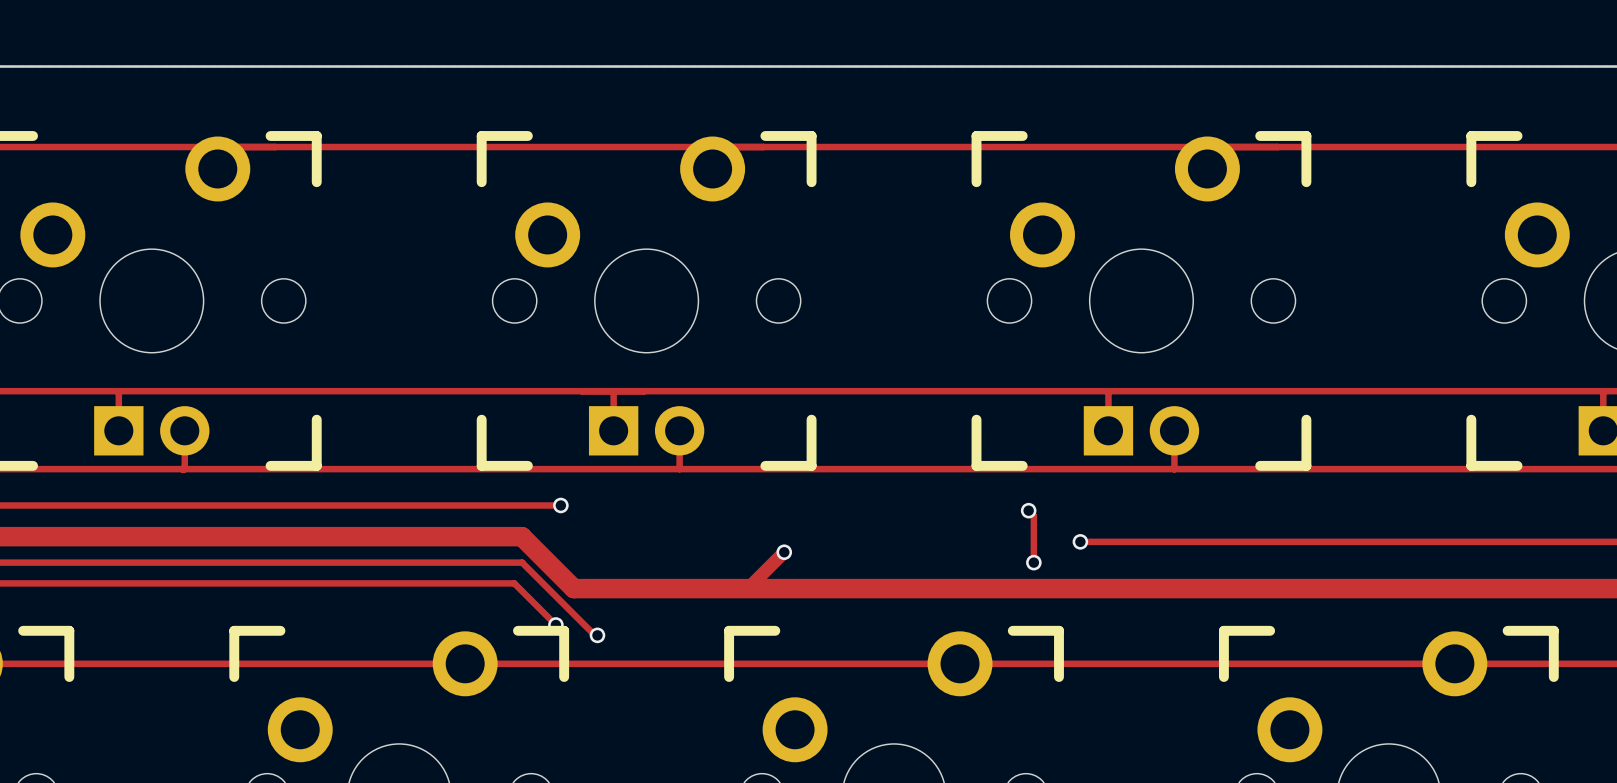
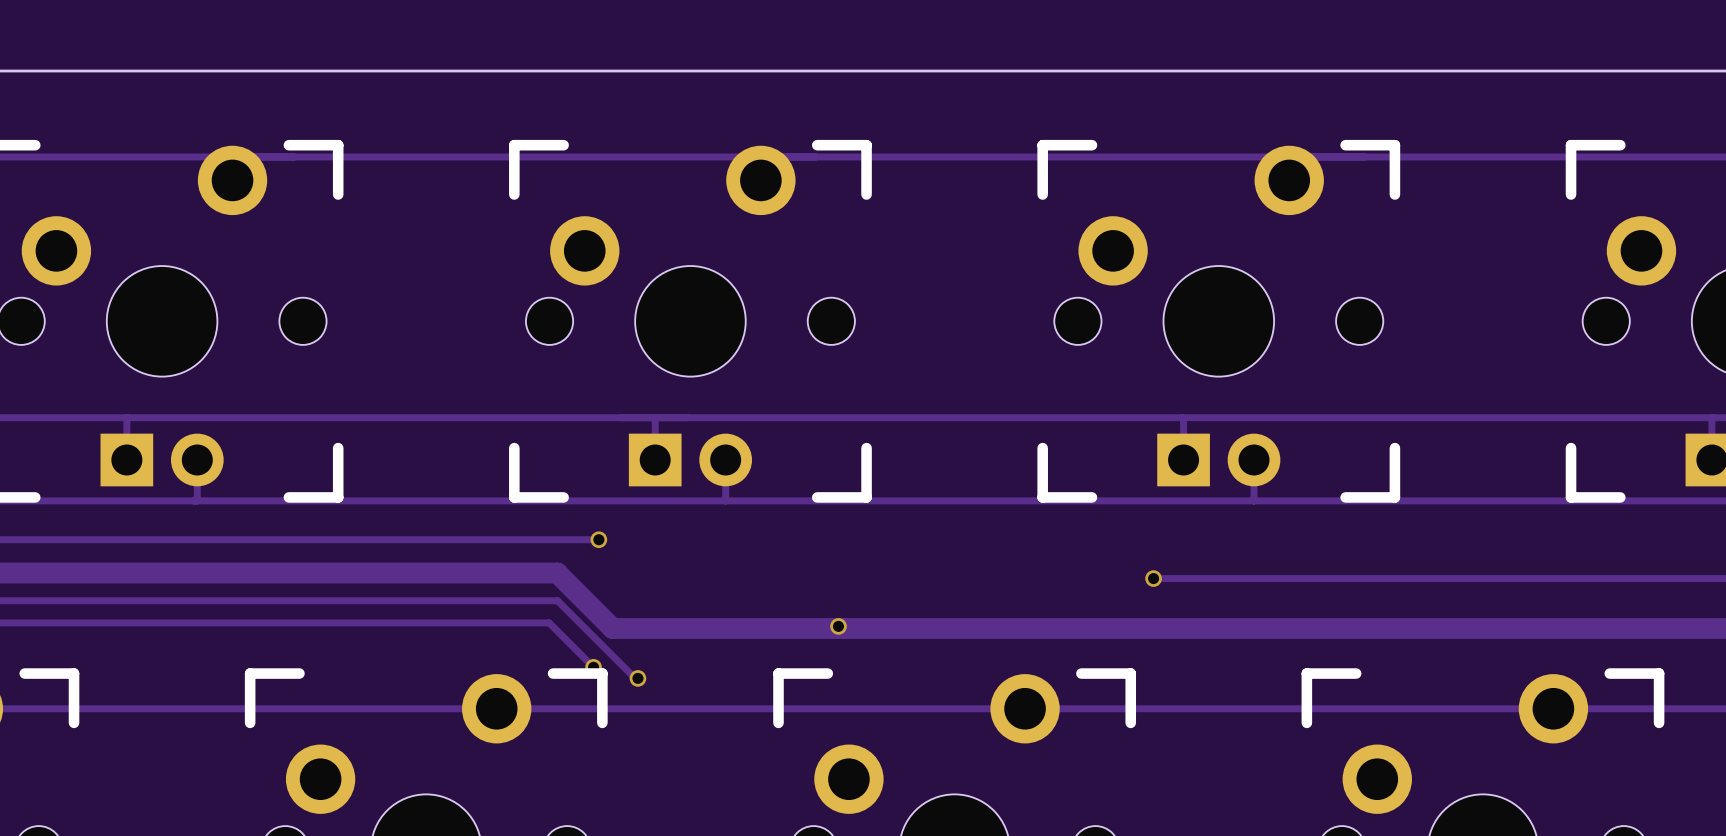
track: (1028, 510) (1033, 515) (1033, 562) -> none
via: (1028, 510) -> none
track: (784, 552) (745, 591) -> none
via position: (784, 552) -> (838, 626)
via: (1033, 562) -> none

